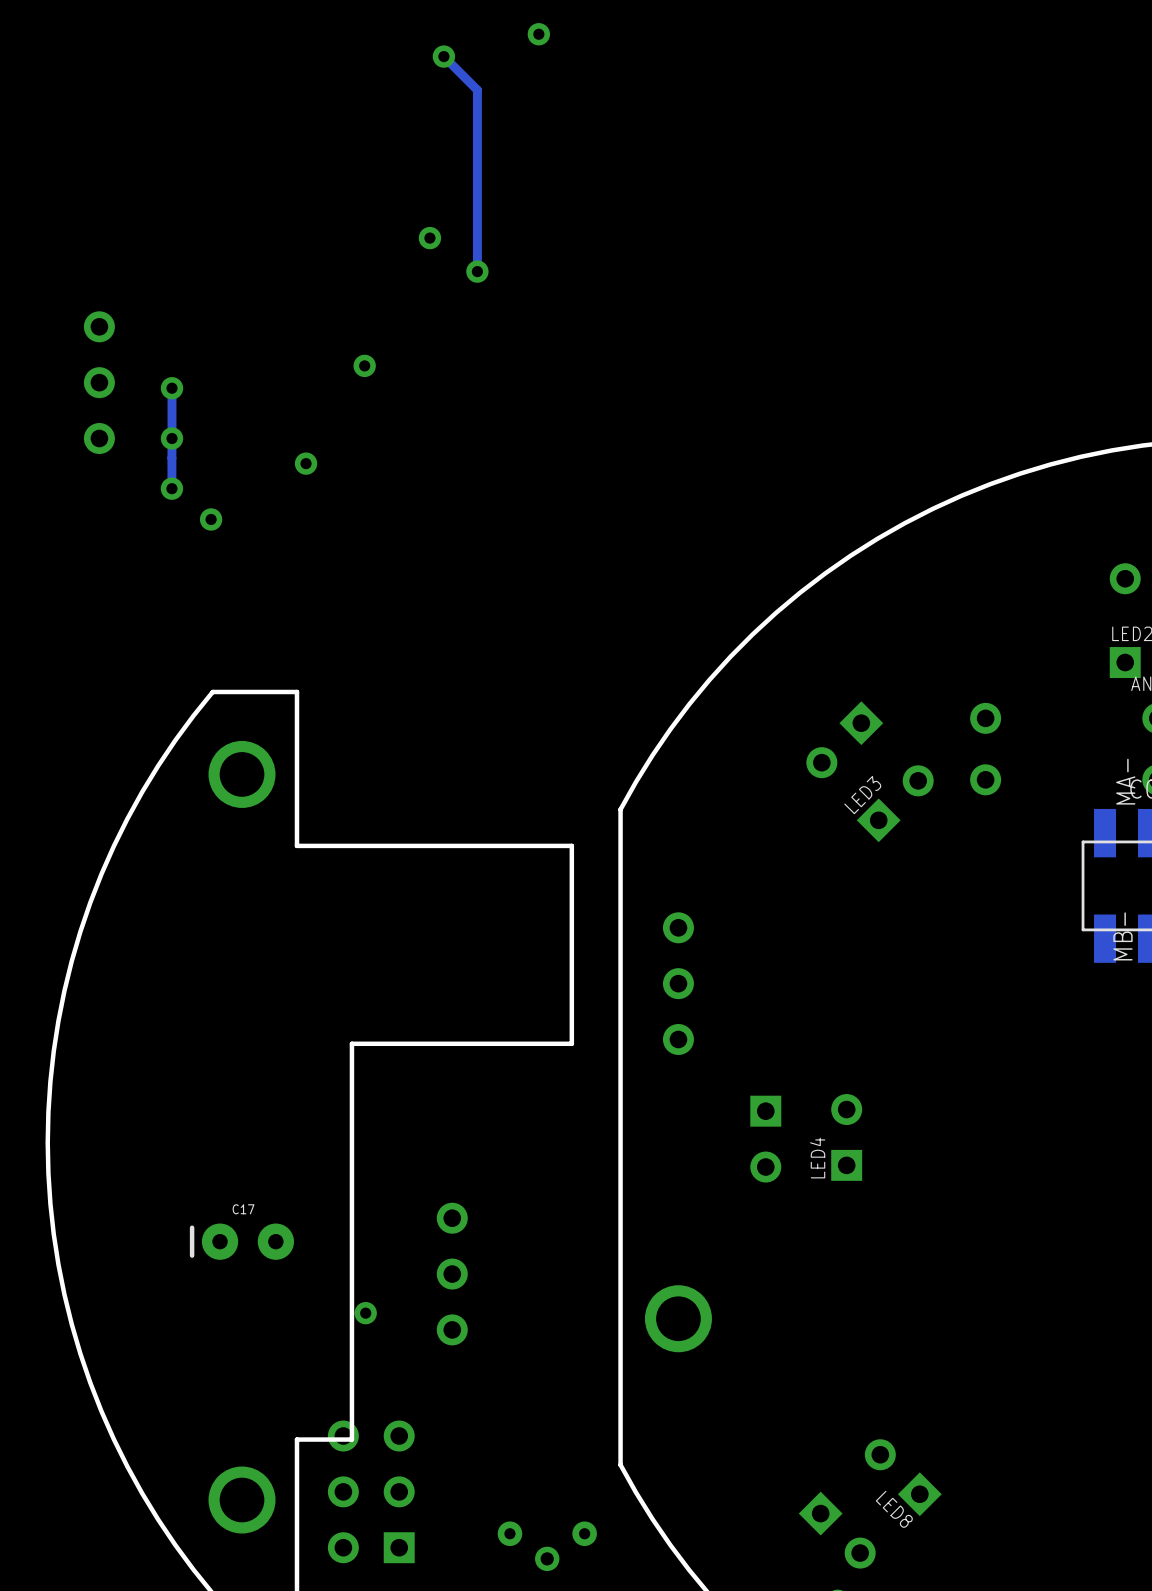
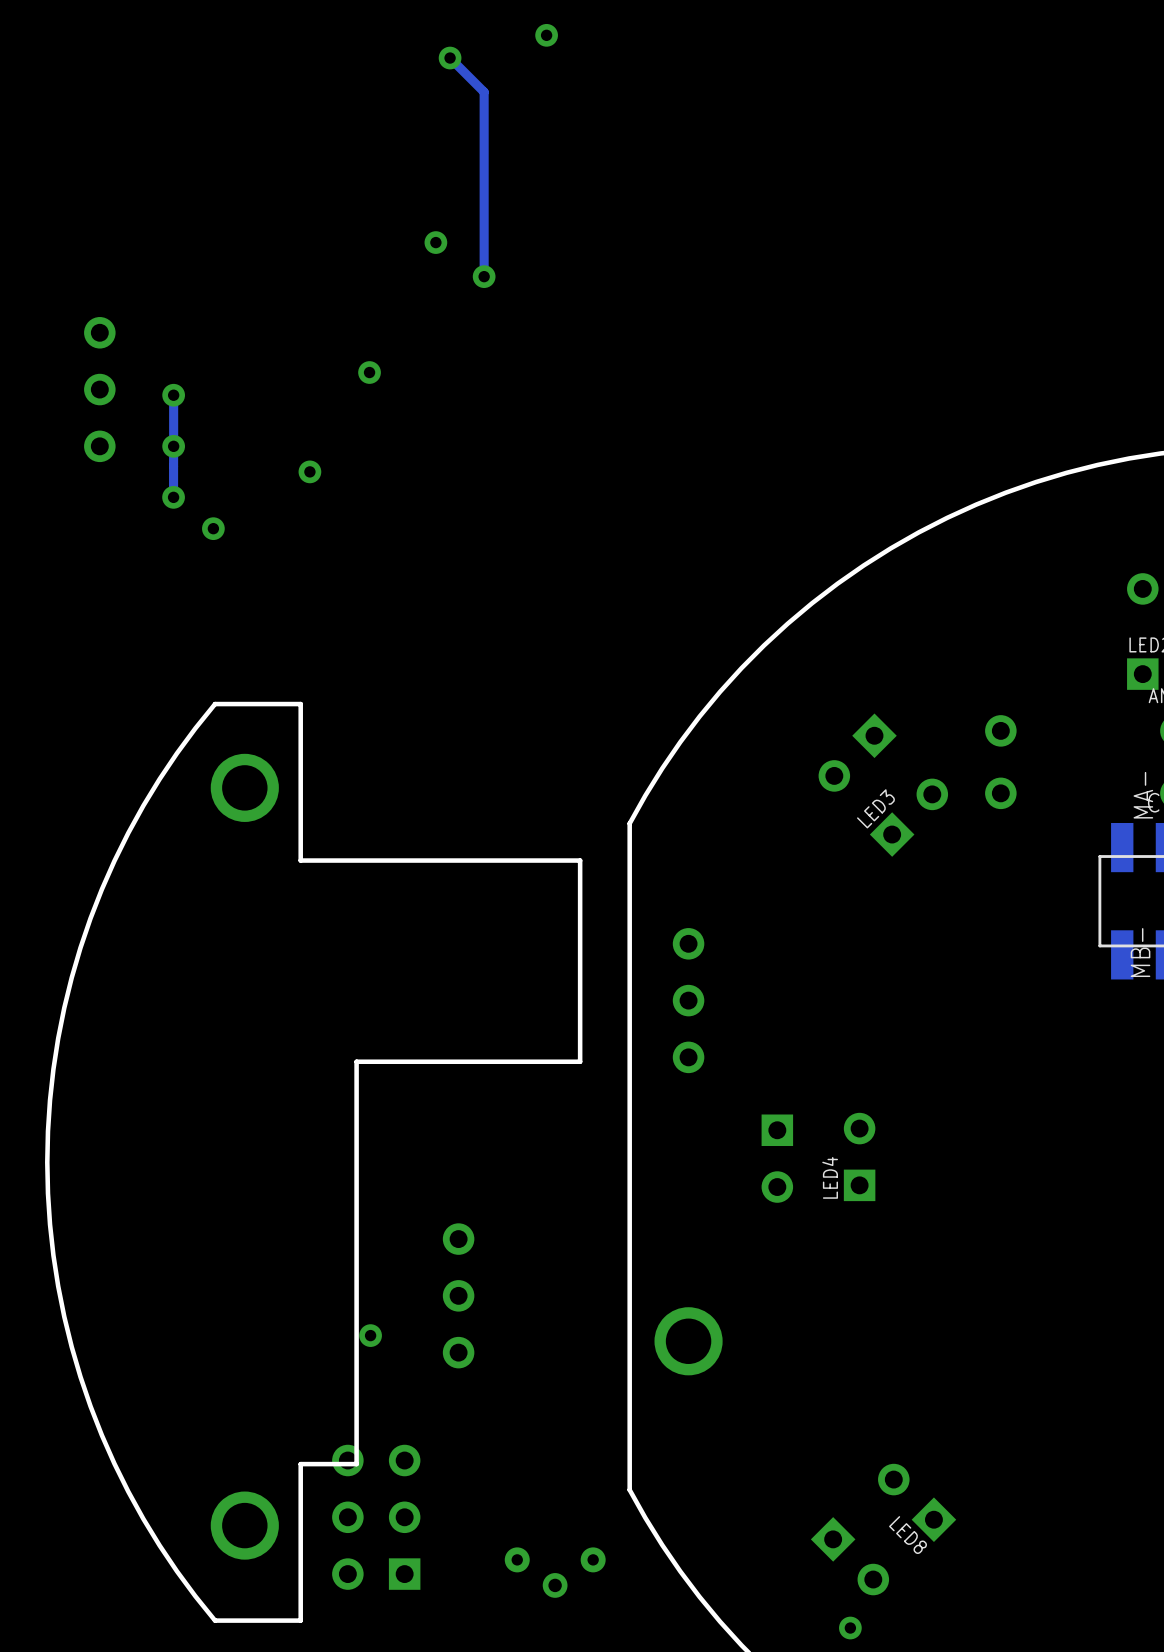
C17: (241, 1241) -> none

